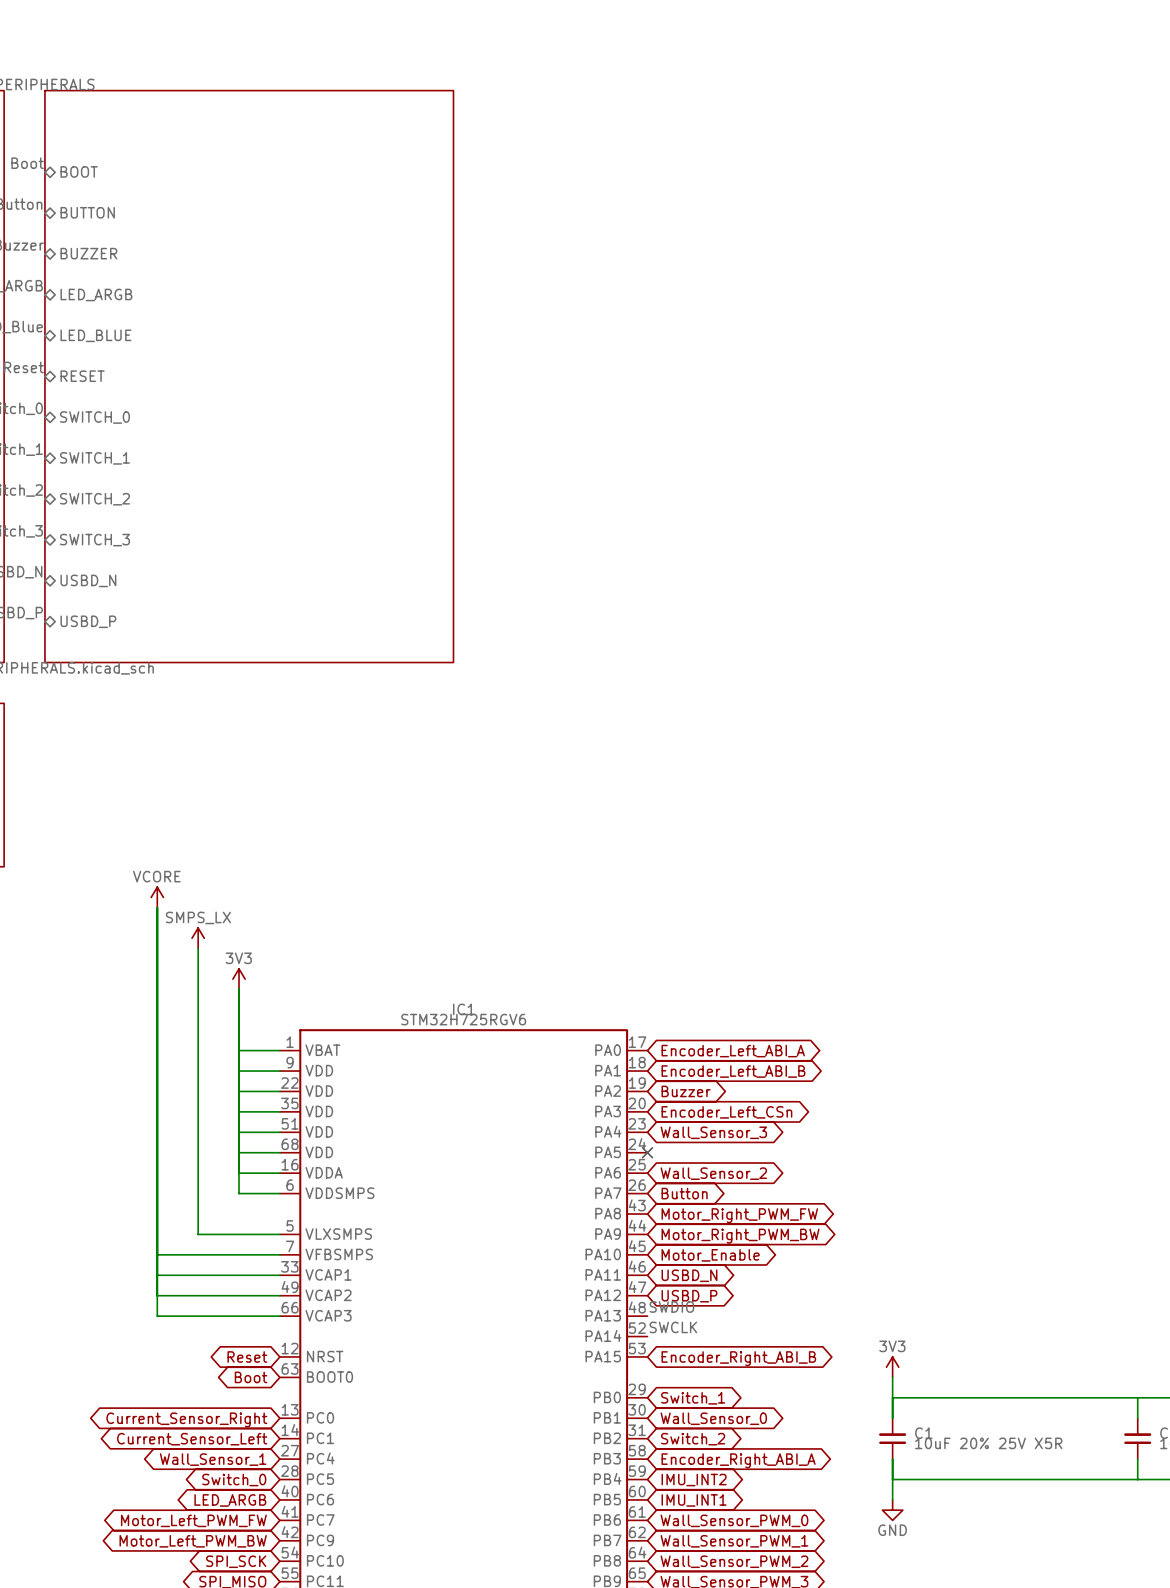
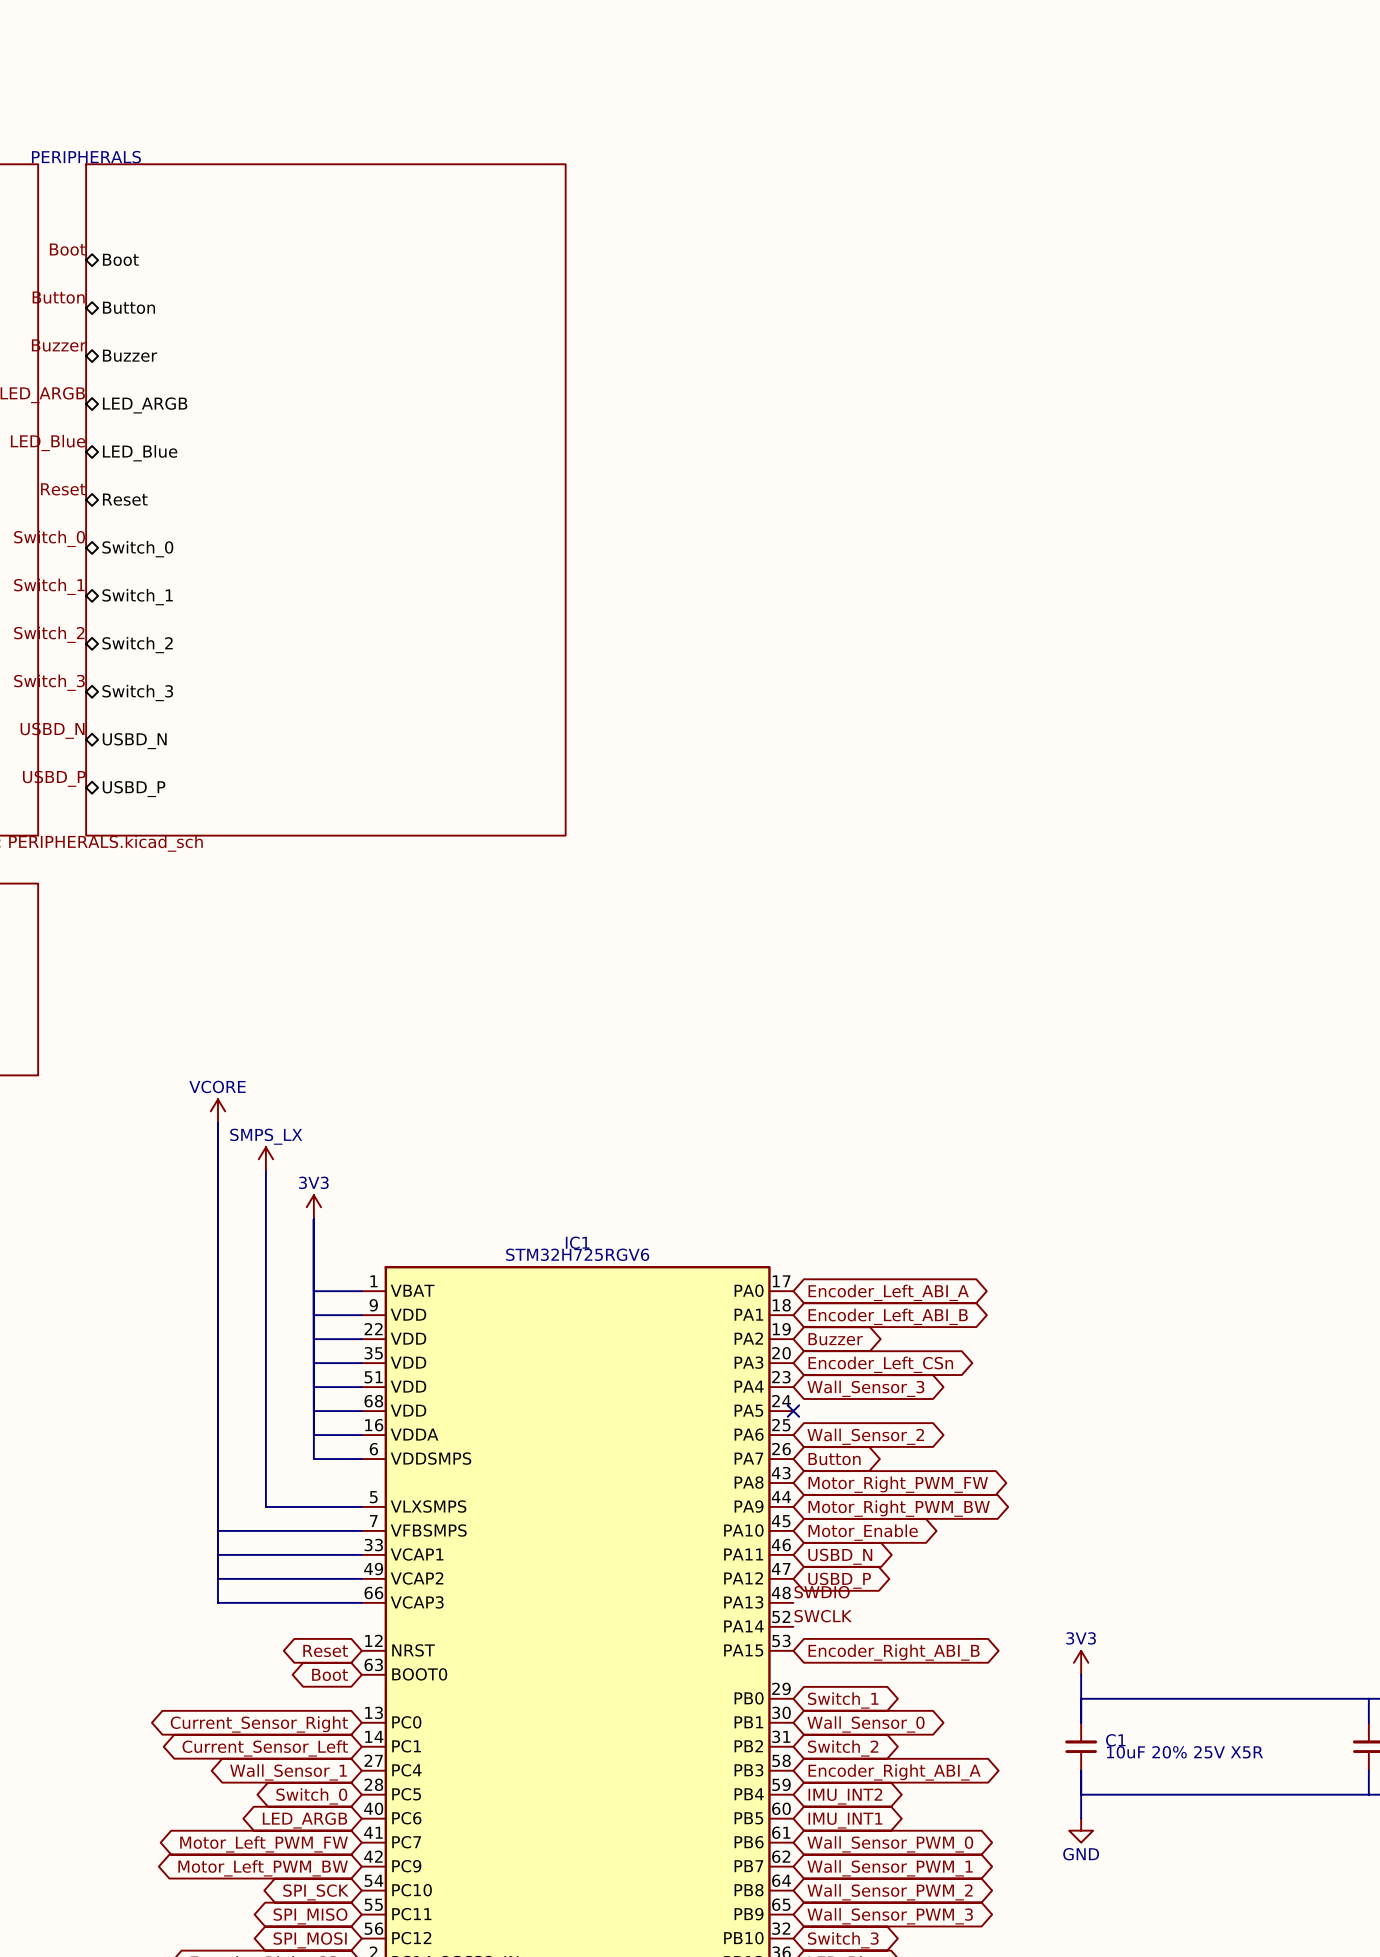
sheet pin: BOOT (79, 171) -> Boot (120, 259)
sheet pin: BUTTON (87, 212) -> Button (128, 307)
sheet pin: BUZZER (88, 253) -> Buzzer (130, 355)
sheet pin: LED_BLUE (95, 335) -> LED_Blue (140, 453)
sheet pin: RESET (82, 376) -> Reset (125, 499)
sheet pin: SWITCH_0 (94, 417) -> Switch_0 (137, 549)
sheet pin: SWITCH_1 (94, 458) -> Switch_1 (137, 597)
sheet pin: SWITCH_2 (94, 499) -> Switch_2 (137, 645)
sheet pin: SWITCH_3 (94, 540) -> Switch_3 (137, 693)

